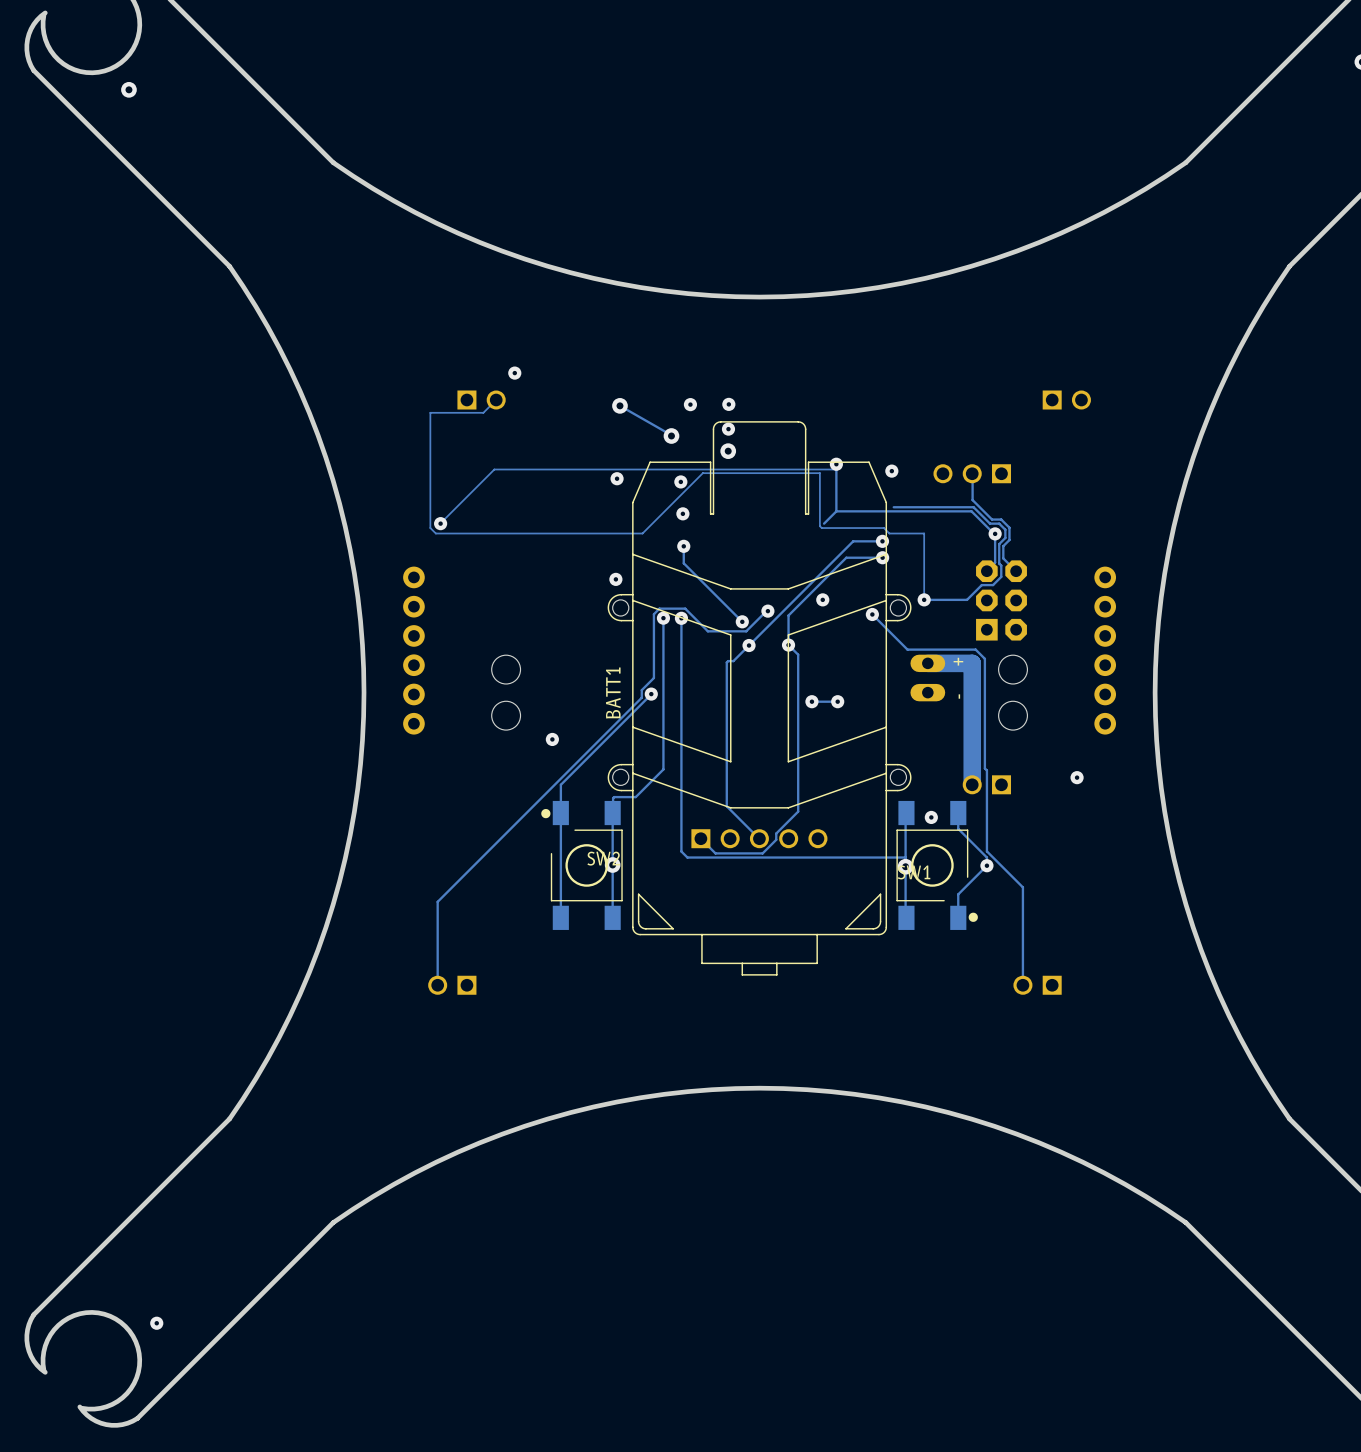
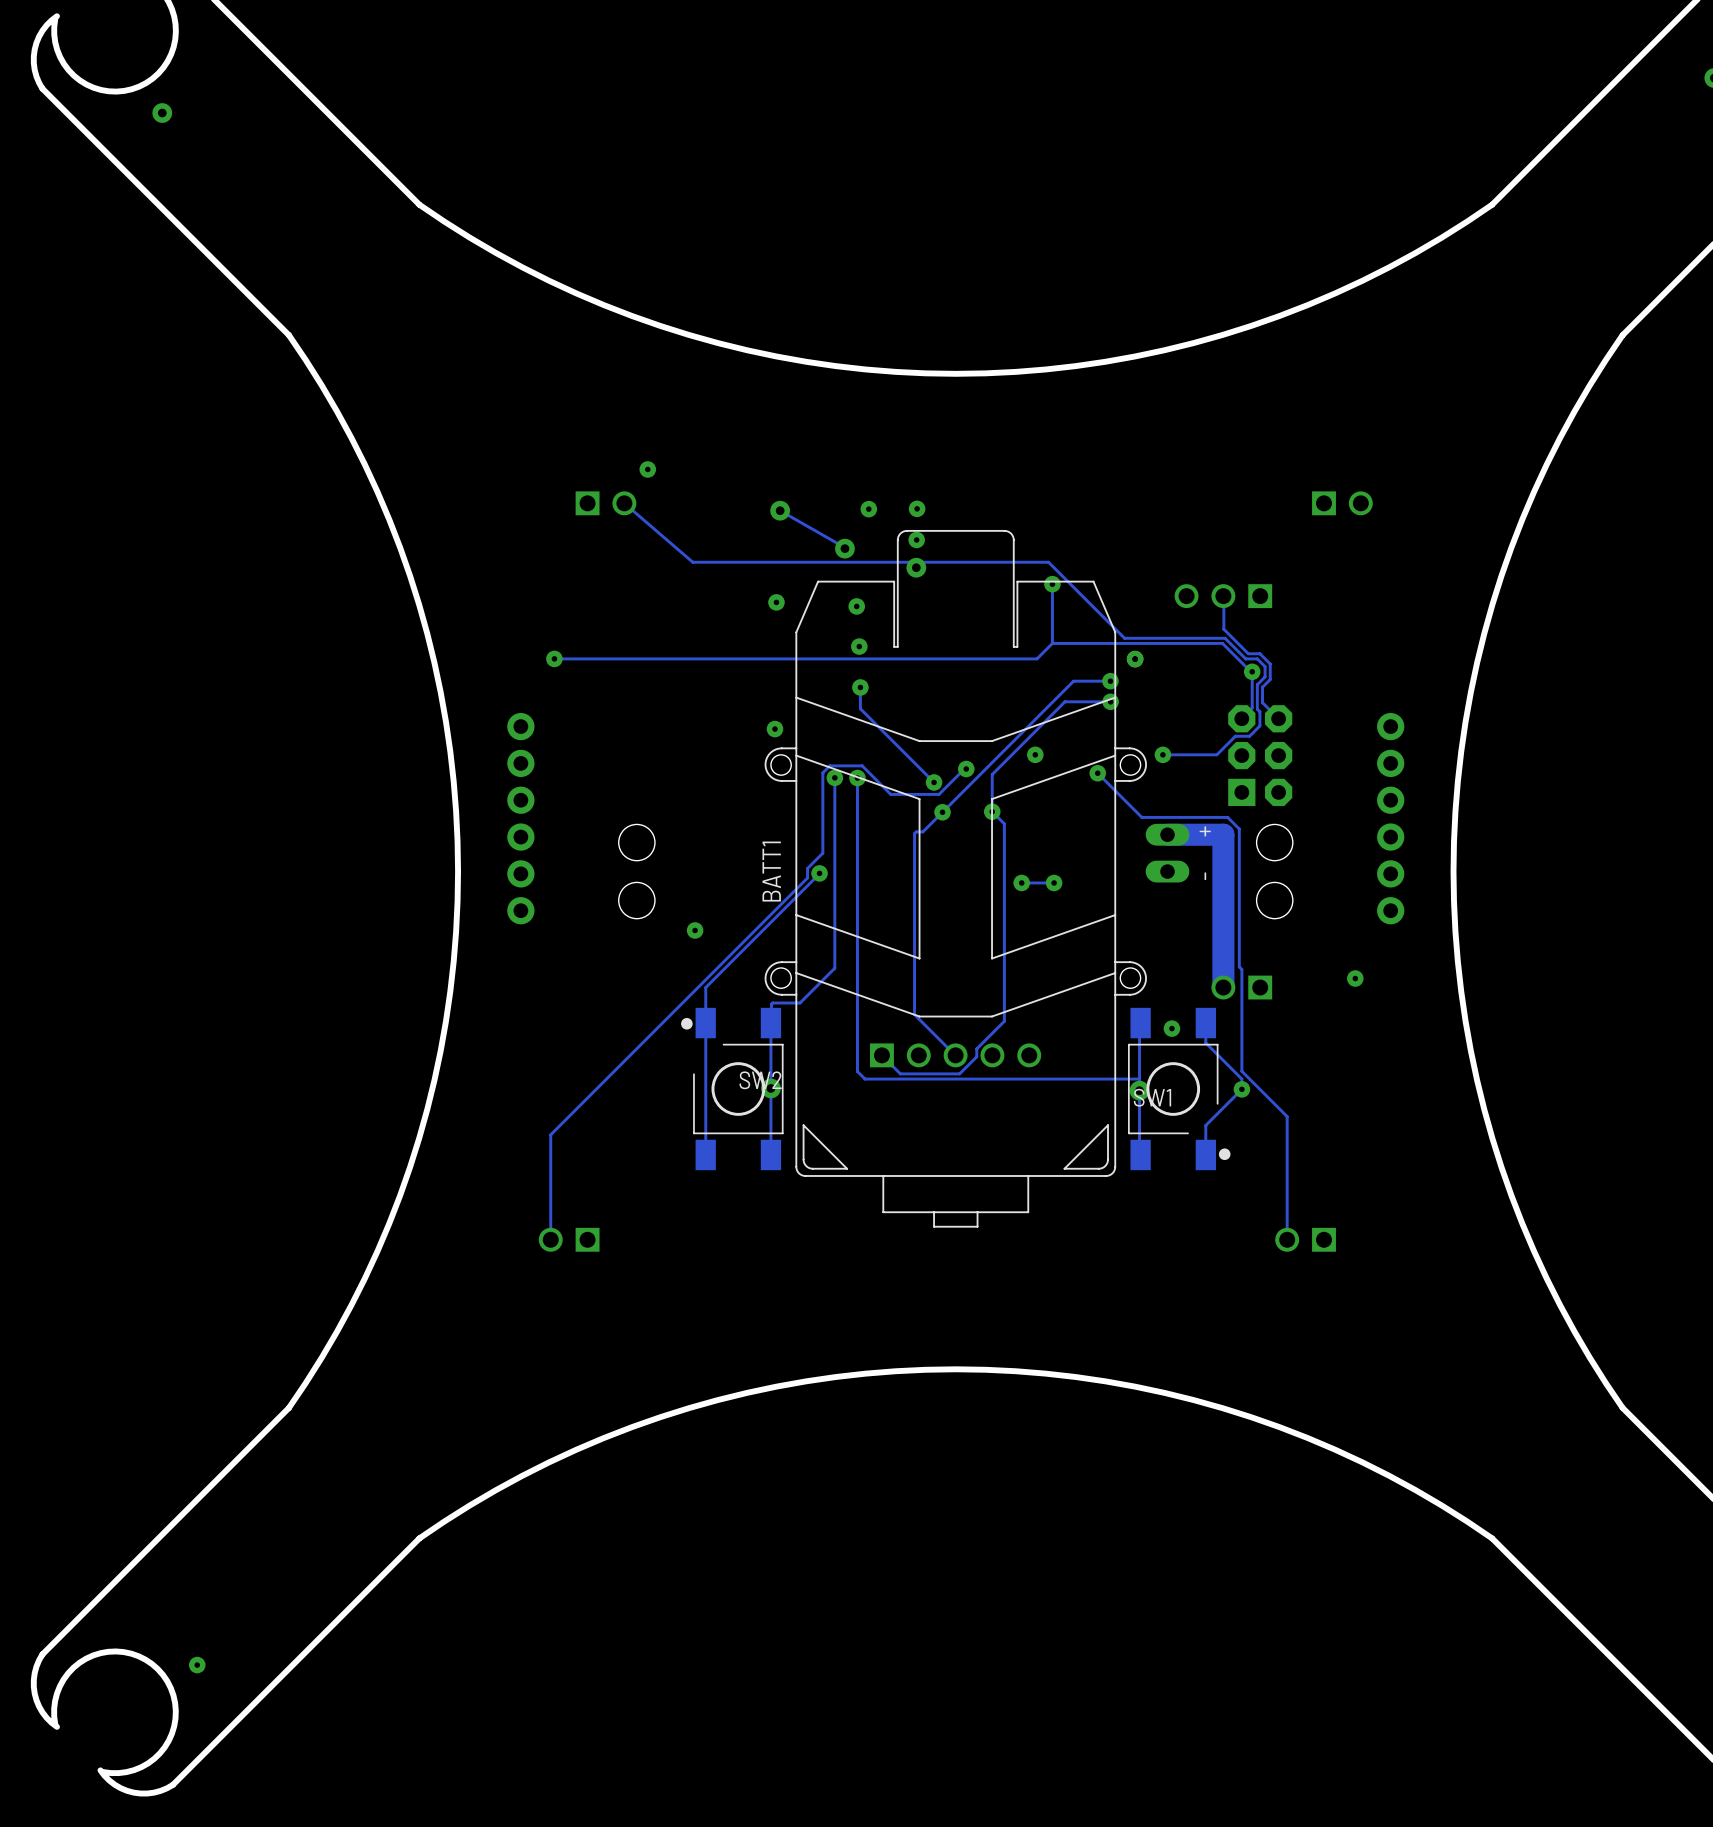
track: (496, 400) (483, 412) (430, 412) (430, 528) (435, 533) (642, 533) (702, 473) (819, 473) (819, 526) (821, 528) (883, 528) (889, 533) (924, 533) (924, 599) -> (624, 503) (692, 562) (1048, 562) (1124, 638)
track: (836, 469) (494, 469) (440, 523) -> (1036, 658) (554, 658)
via position: (891, 471) -> (1135, 659)

